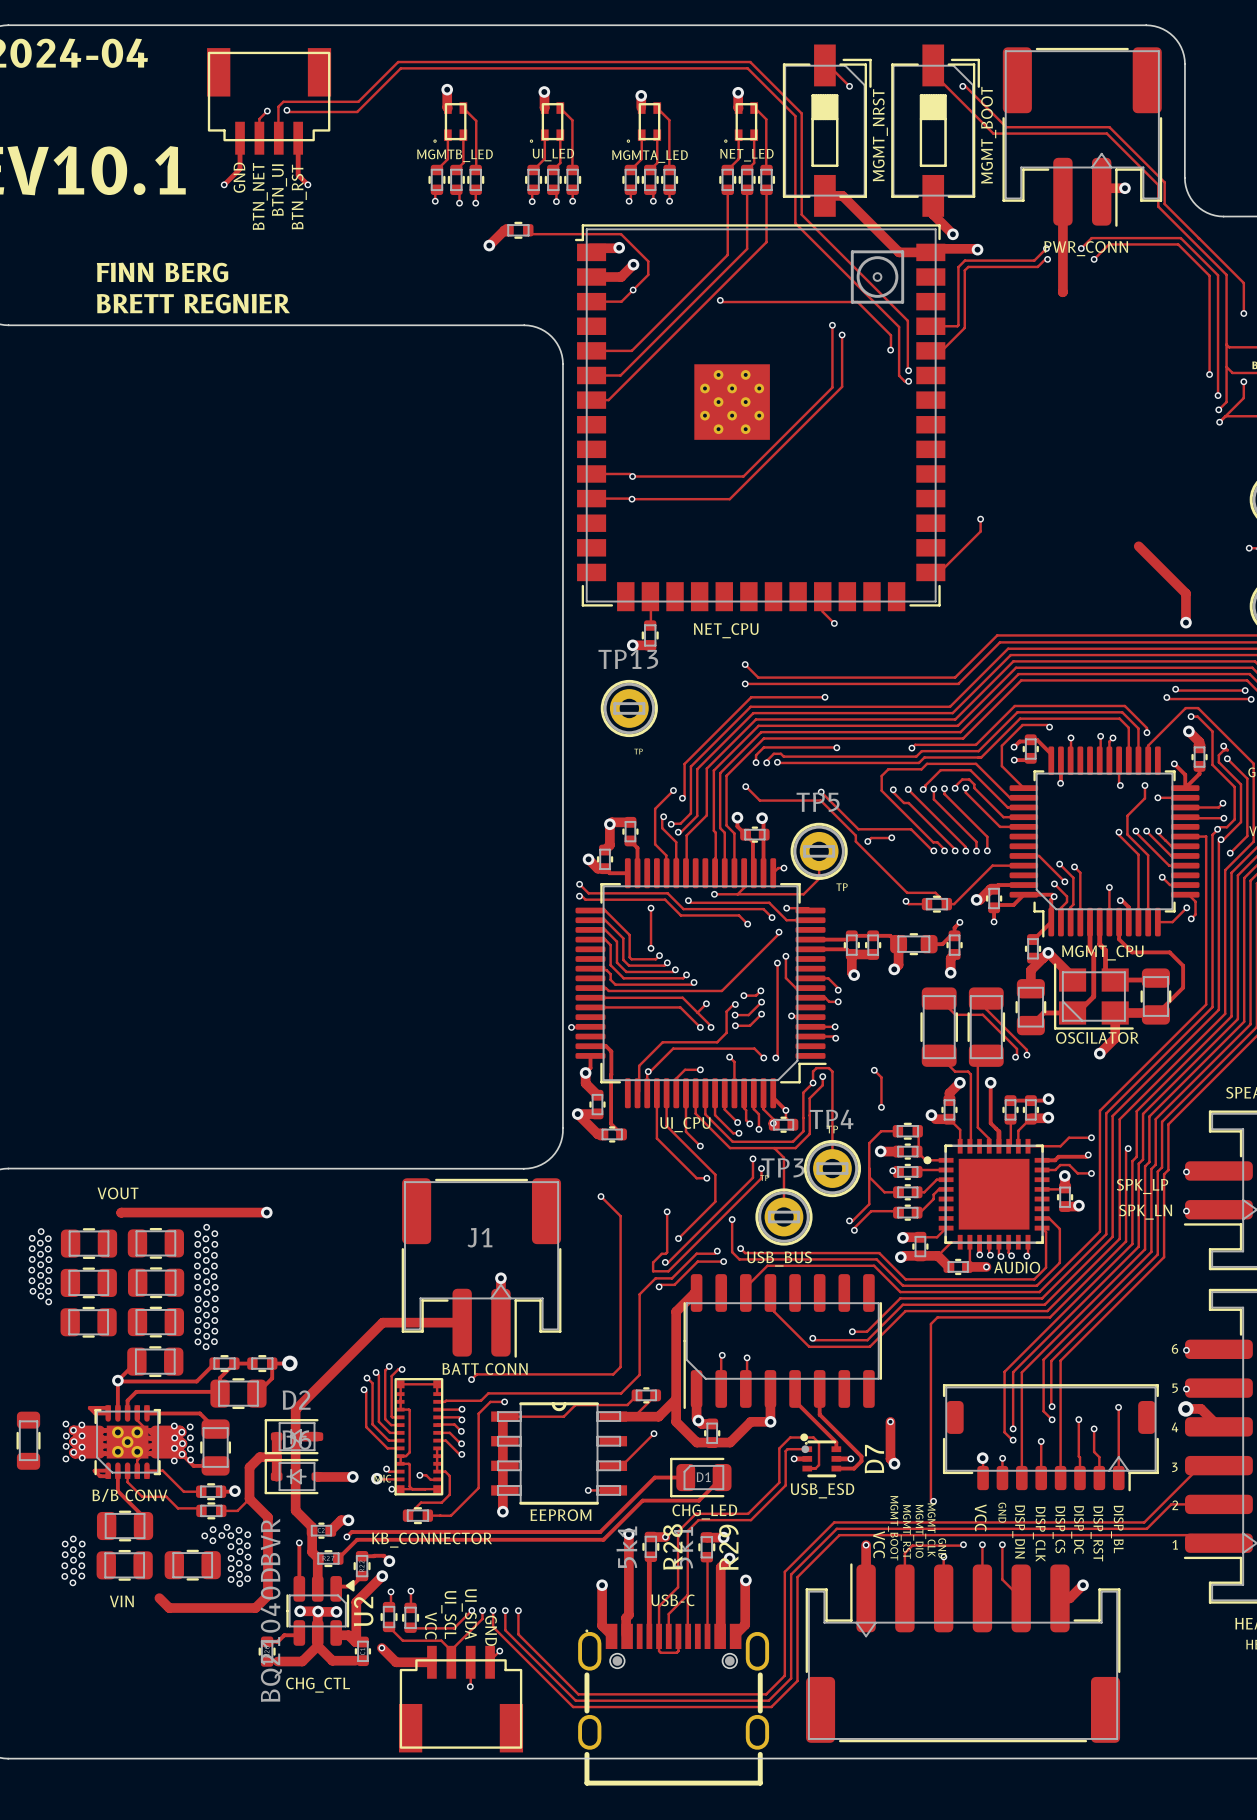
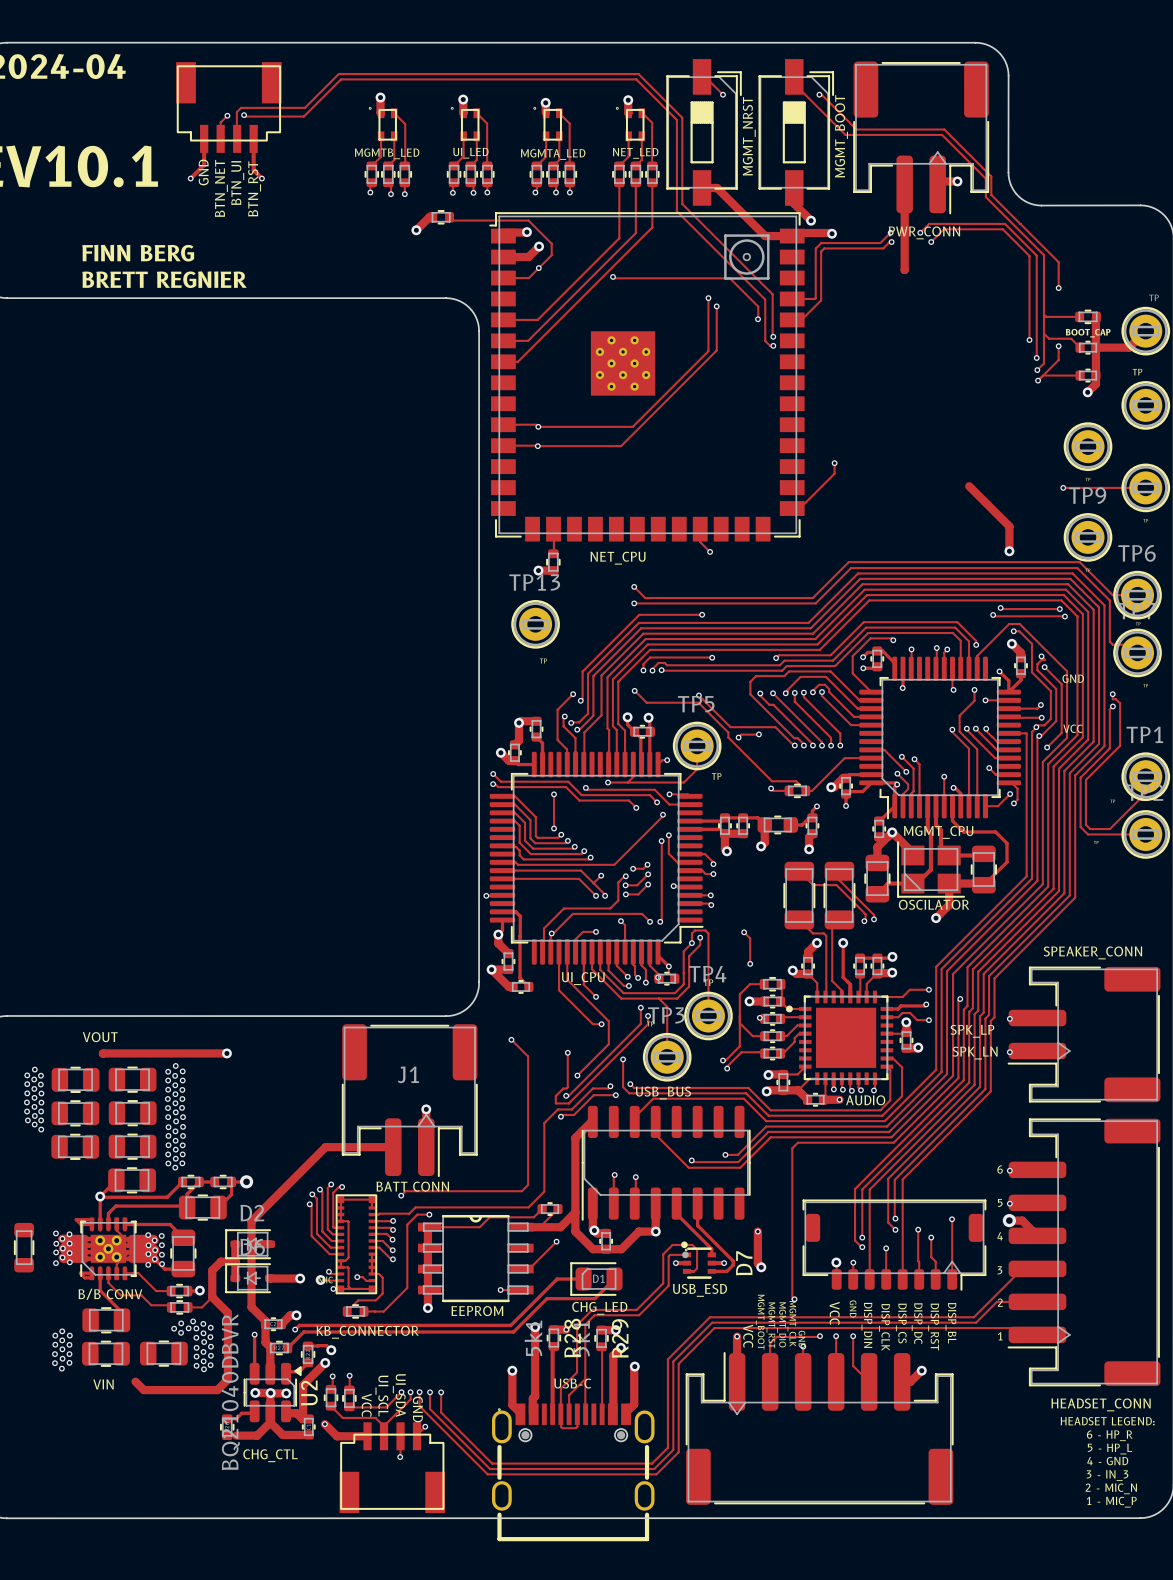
drawing position: (435, 141) -> (370, 108)
drawing position: (531, 141) -> (452, 108)
drawing position: (628, 141) -> (534, 108)
drawing position: (725, 141) -> (617, 108)

